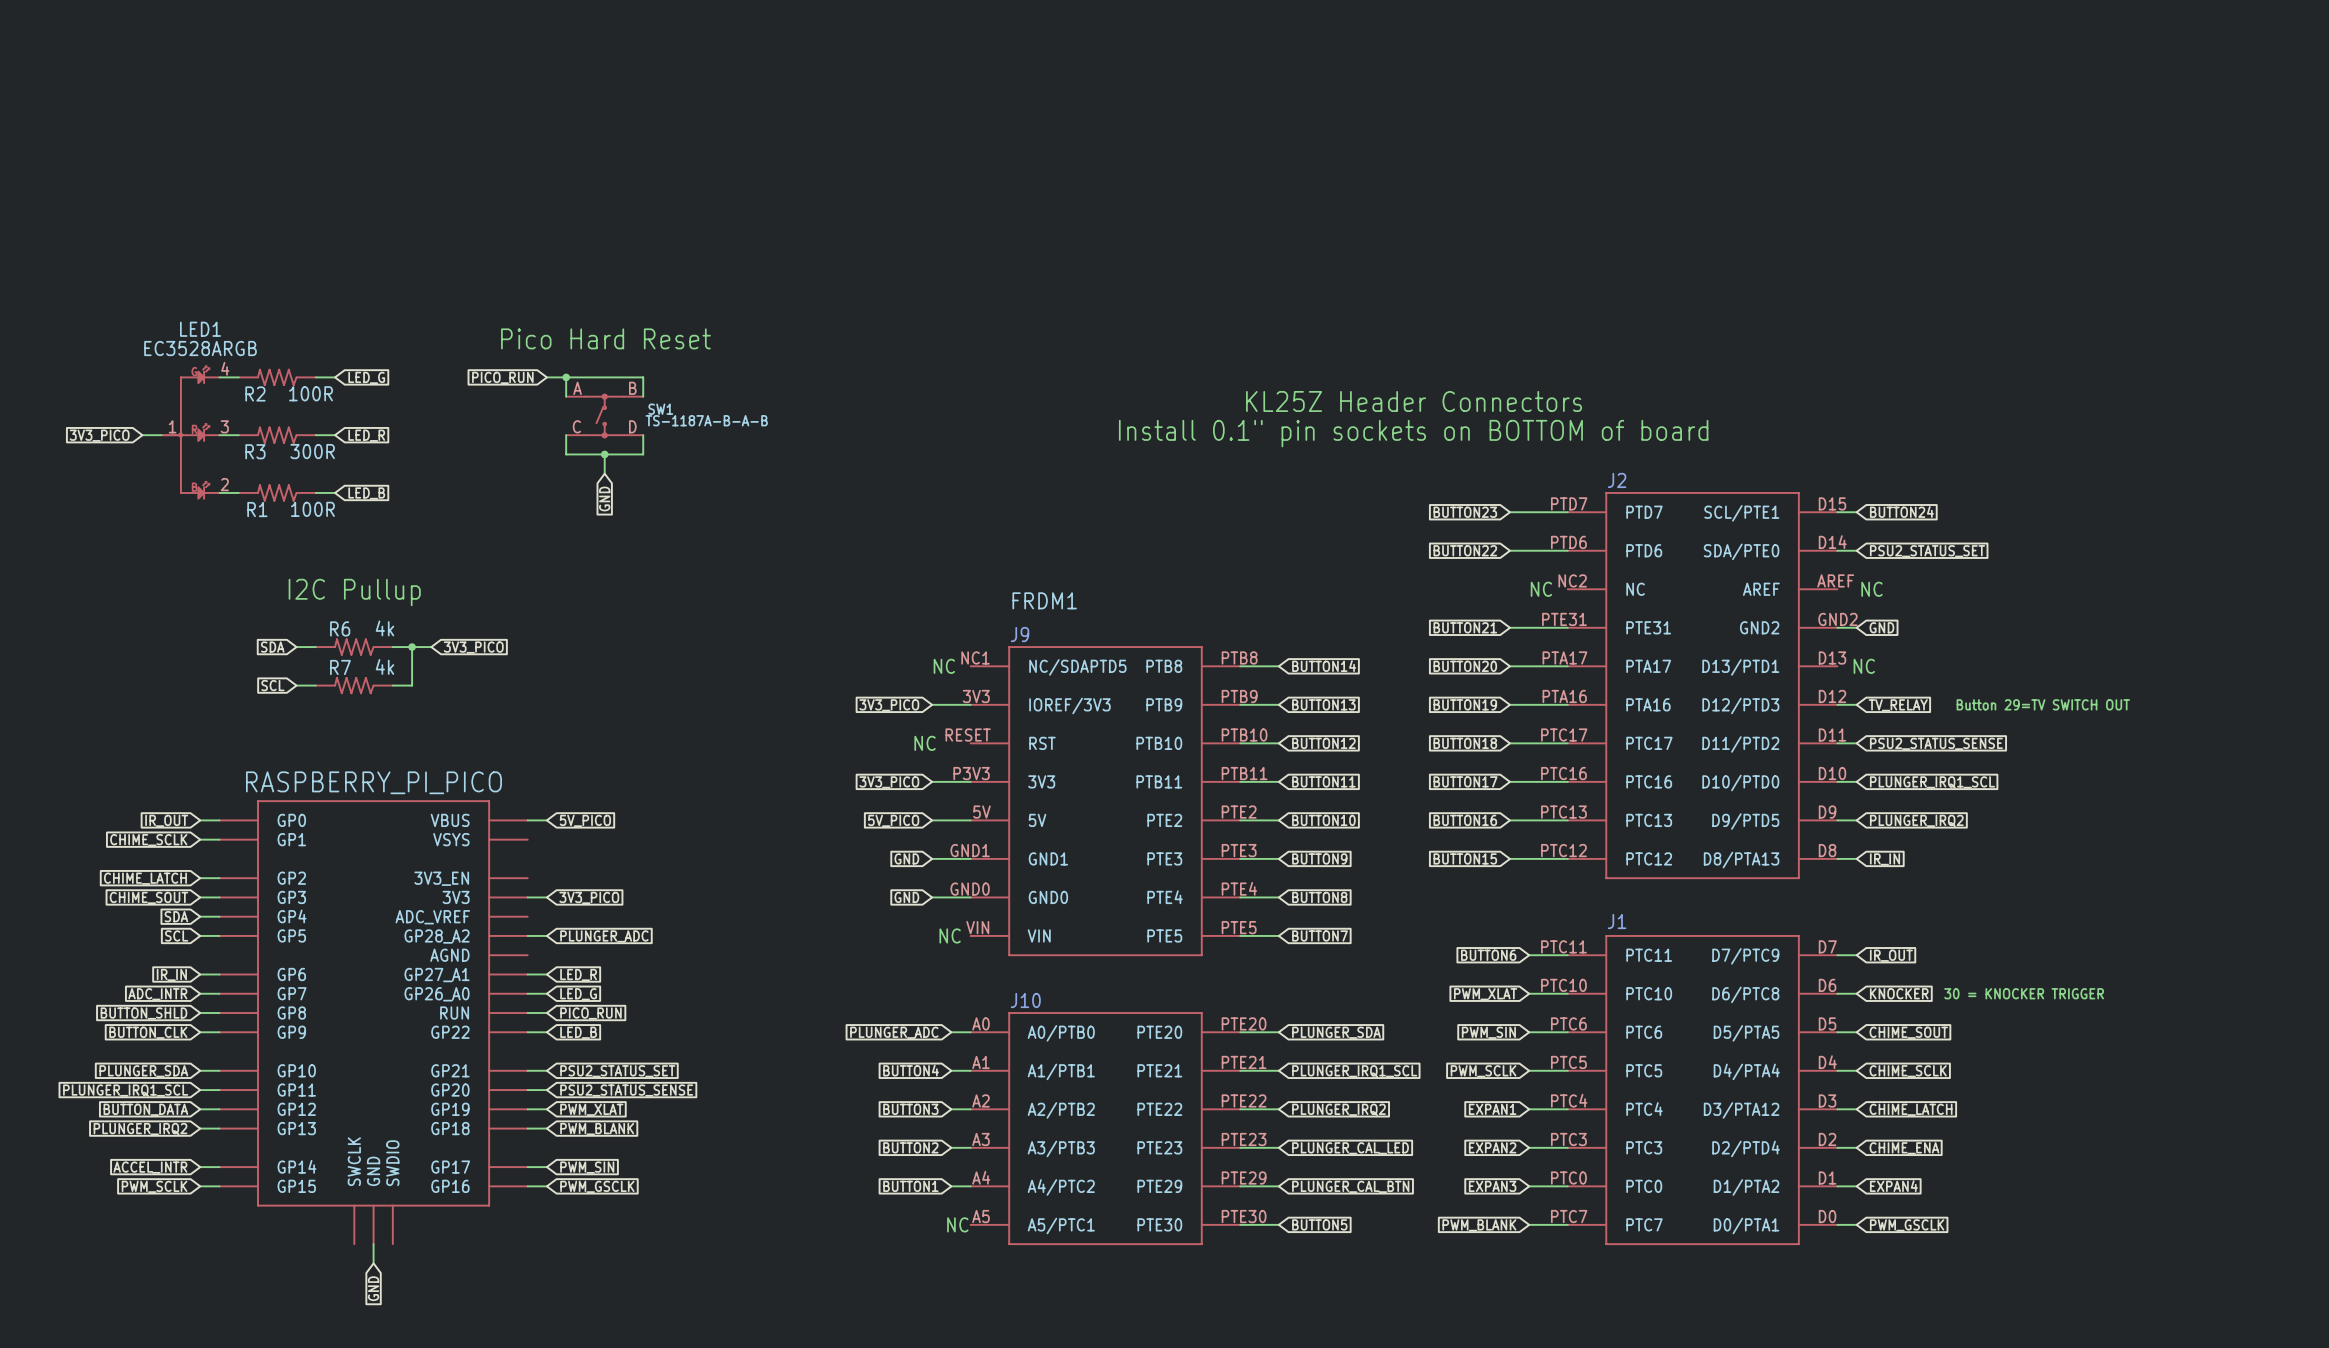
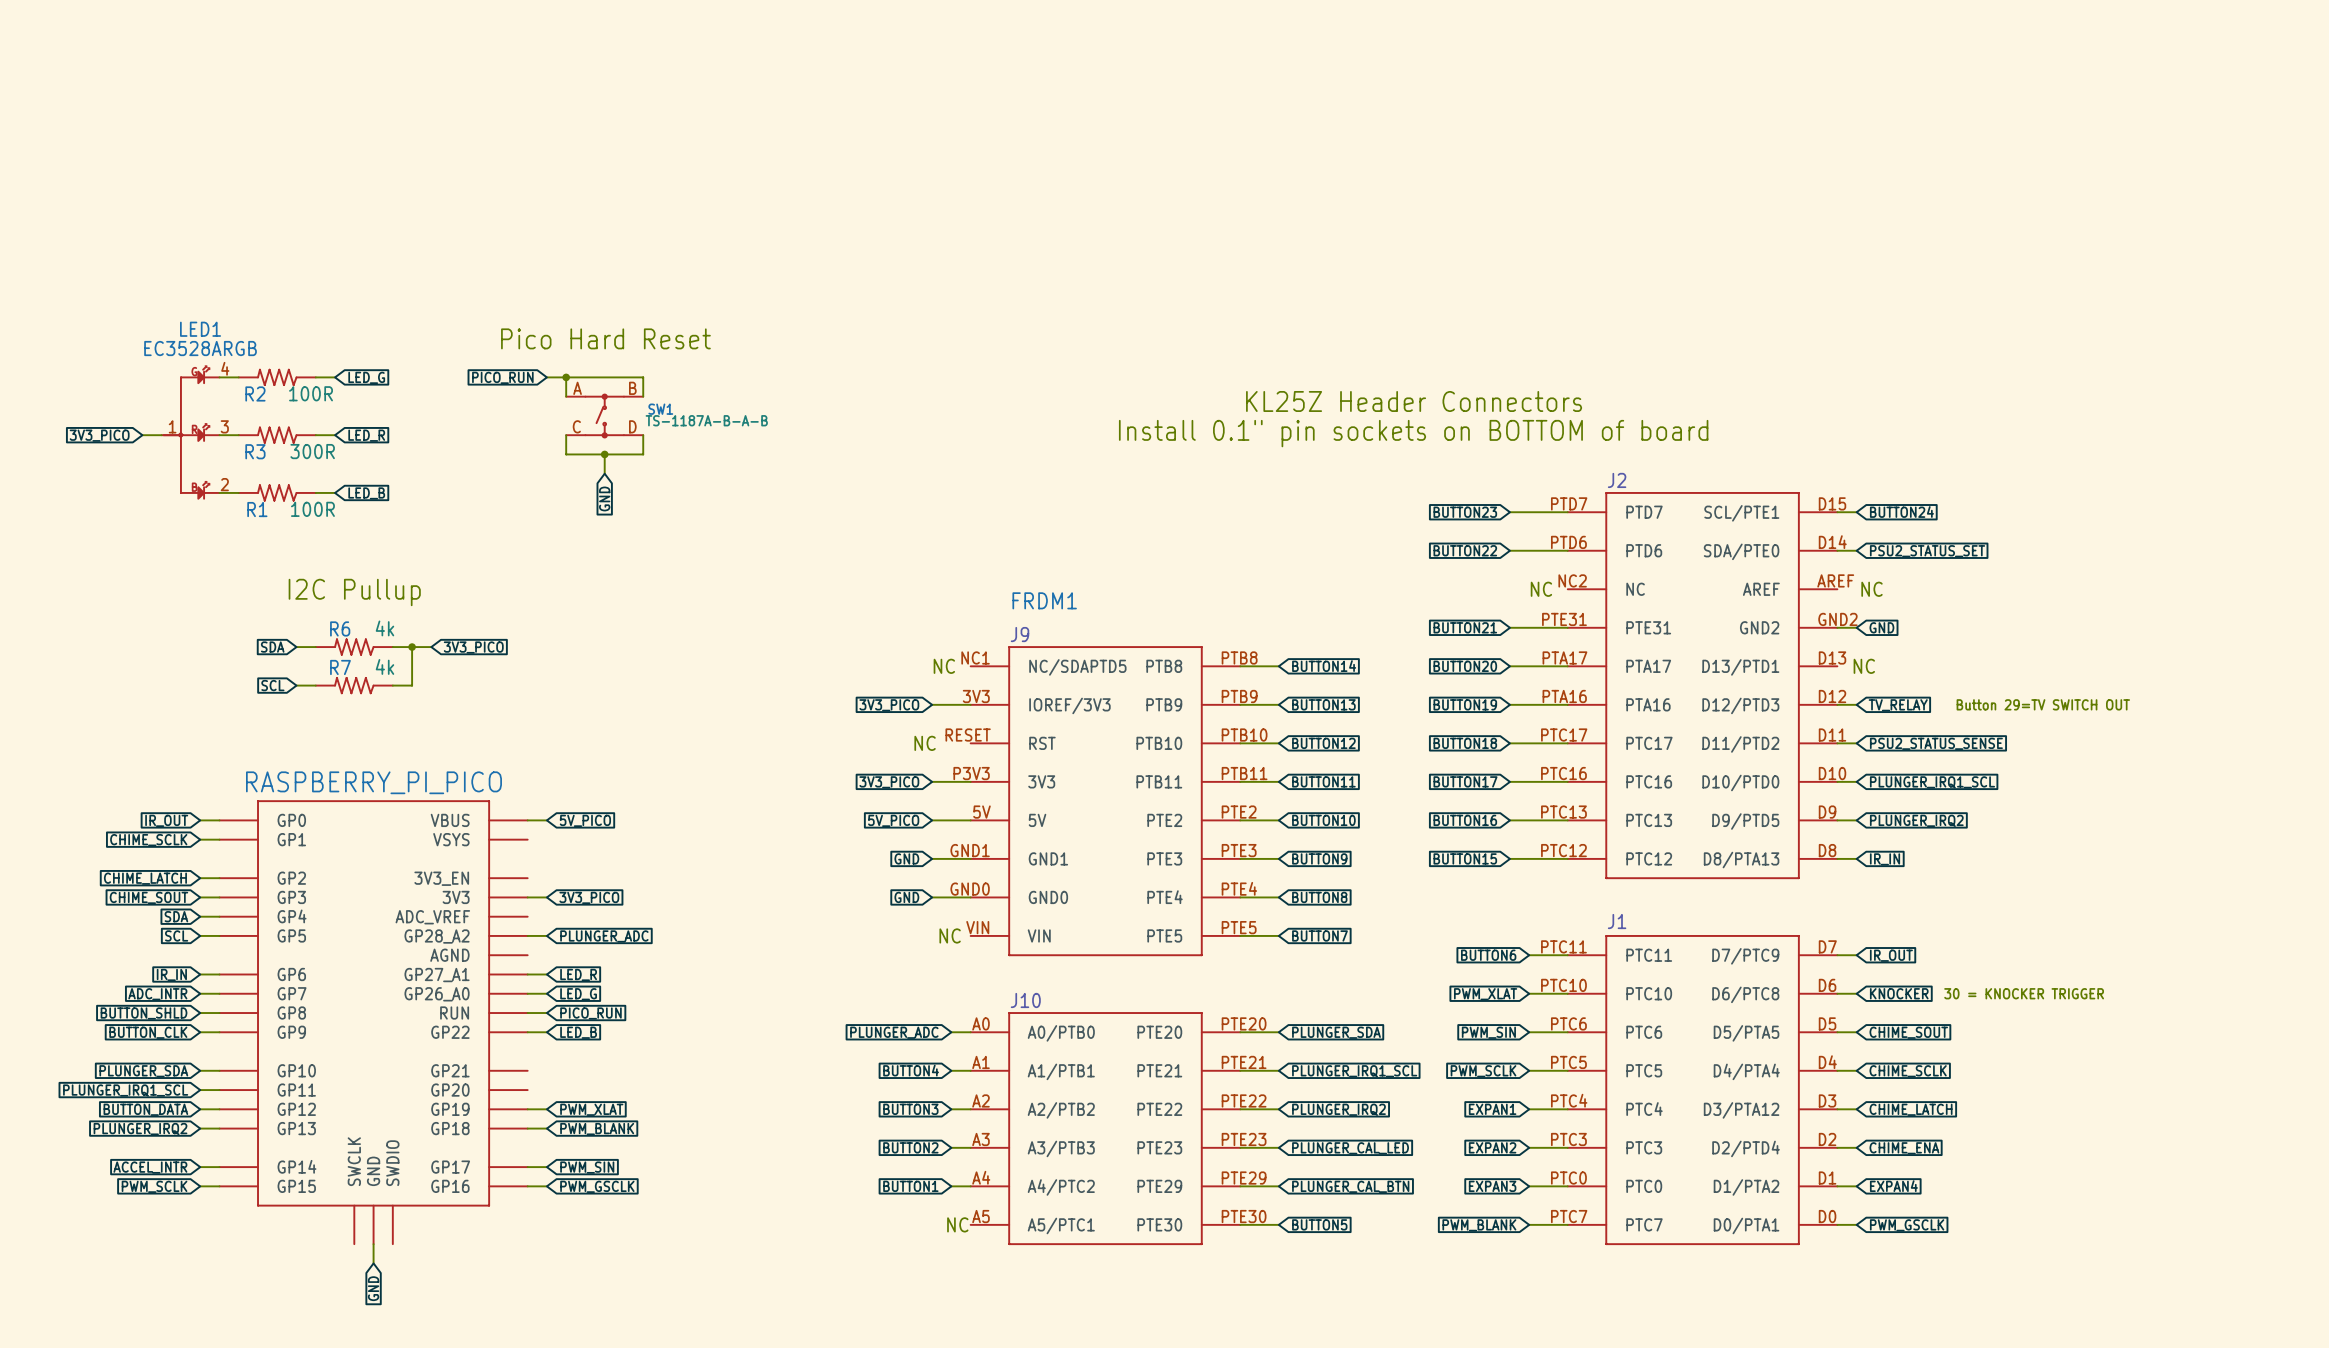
wire: (527, 1070) (546, 1070) -> none
global label: PSU2_STATUS_SET (617, 1071) -> none
wire: (527, 1090) (546, 1090) -> none
global label: PSU2_STATUS_SENSE (626, 1090) -> none

